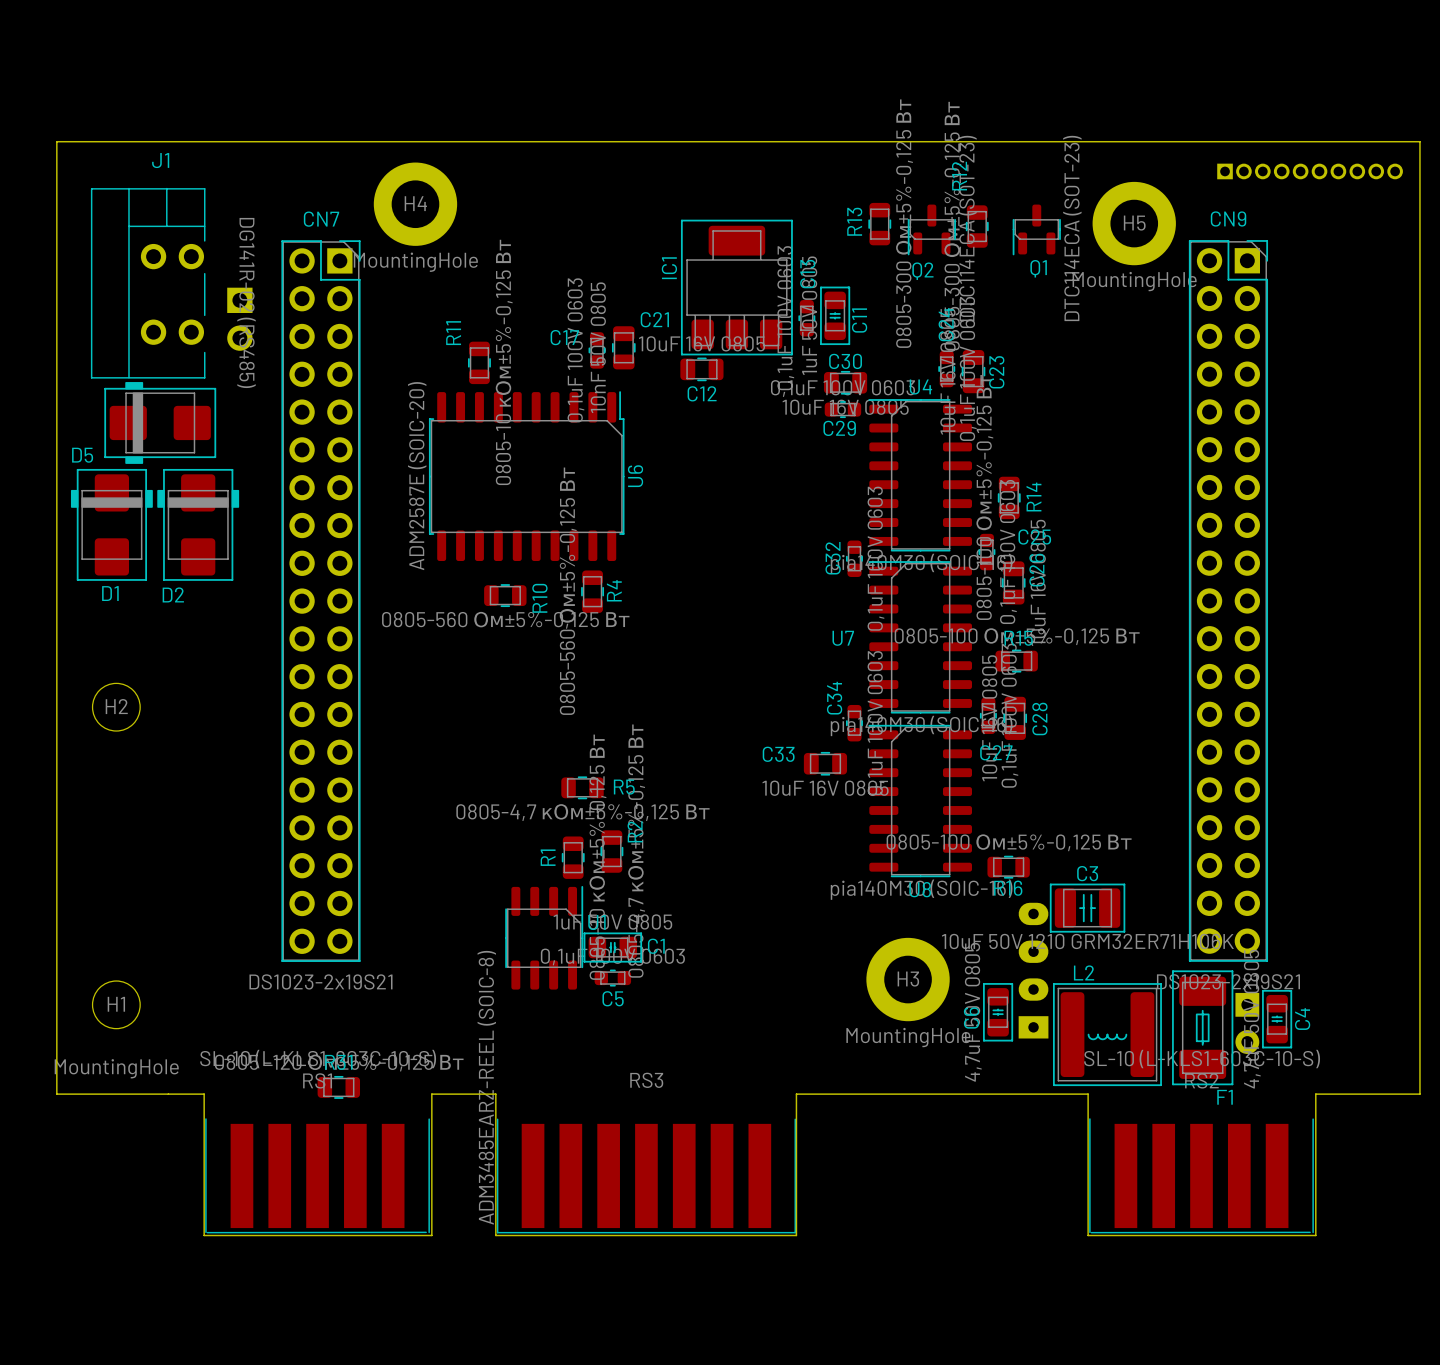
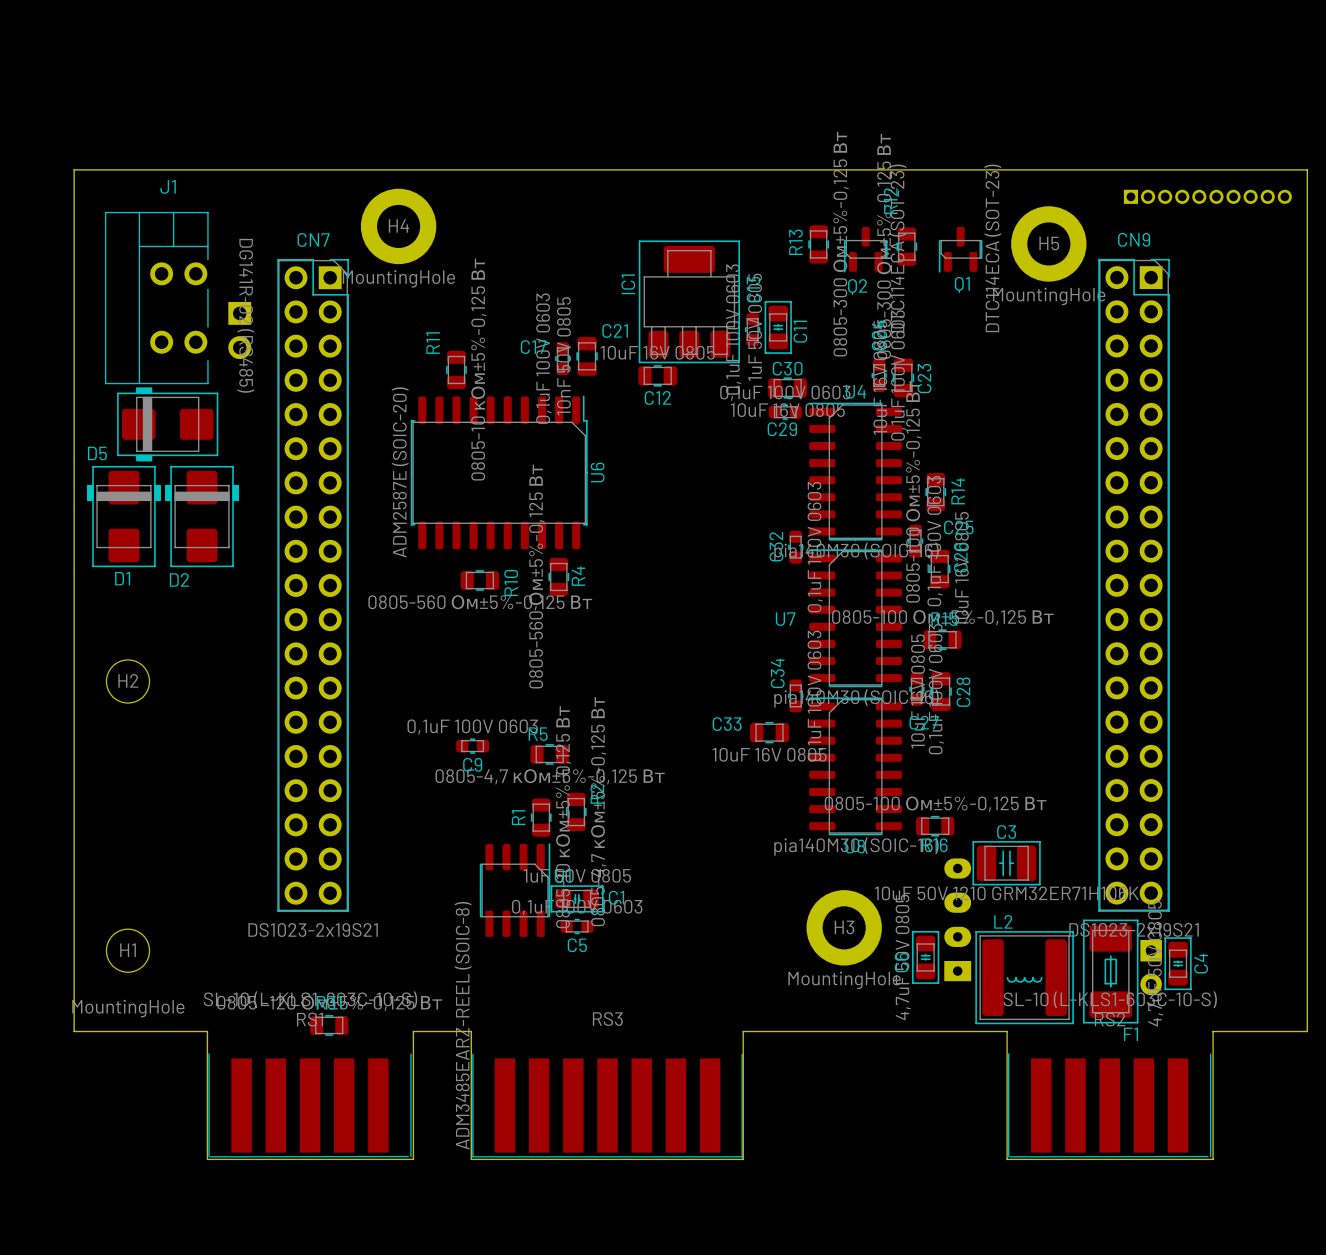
C9: none -> 0,1uF 100V 0603 (472, 746)
R5 name position: R5 (624, 787) -> R5 (538, 734)

